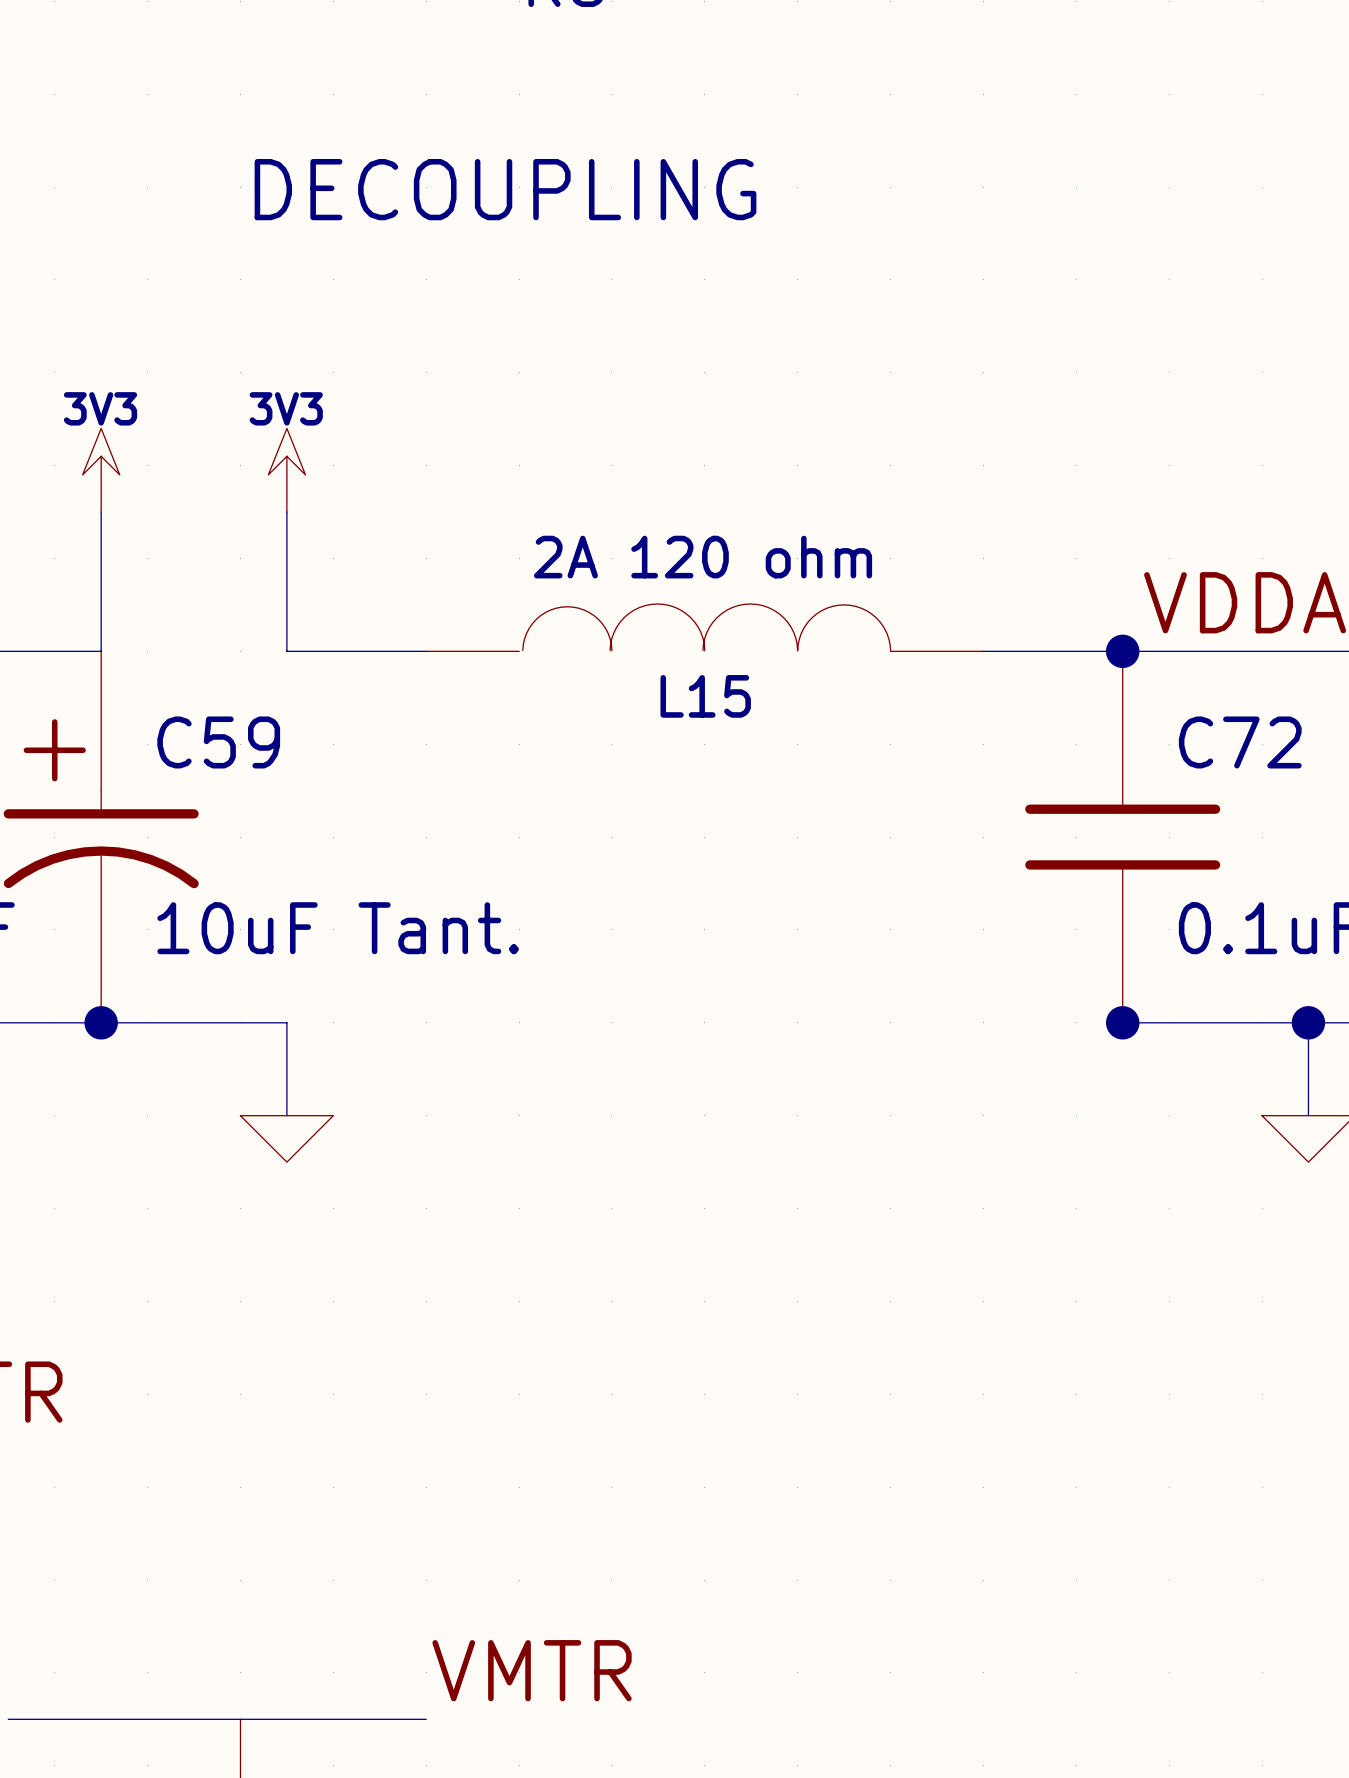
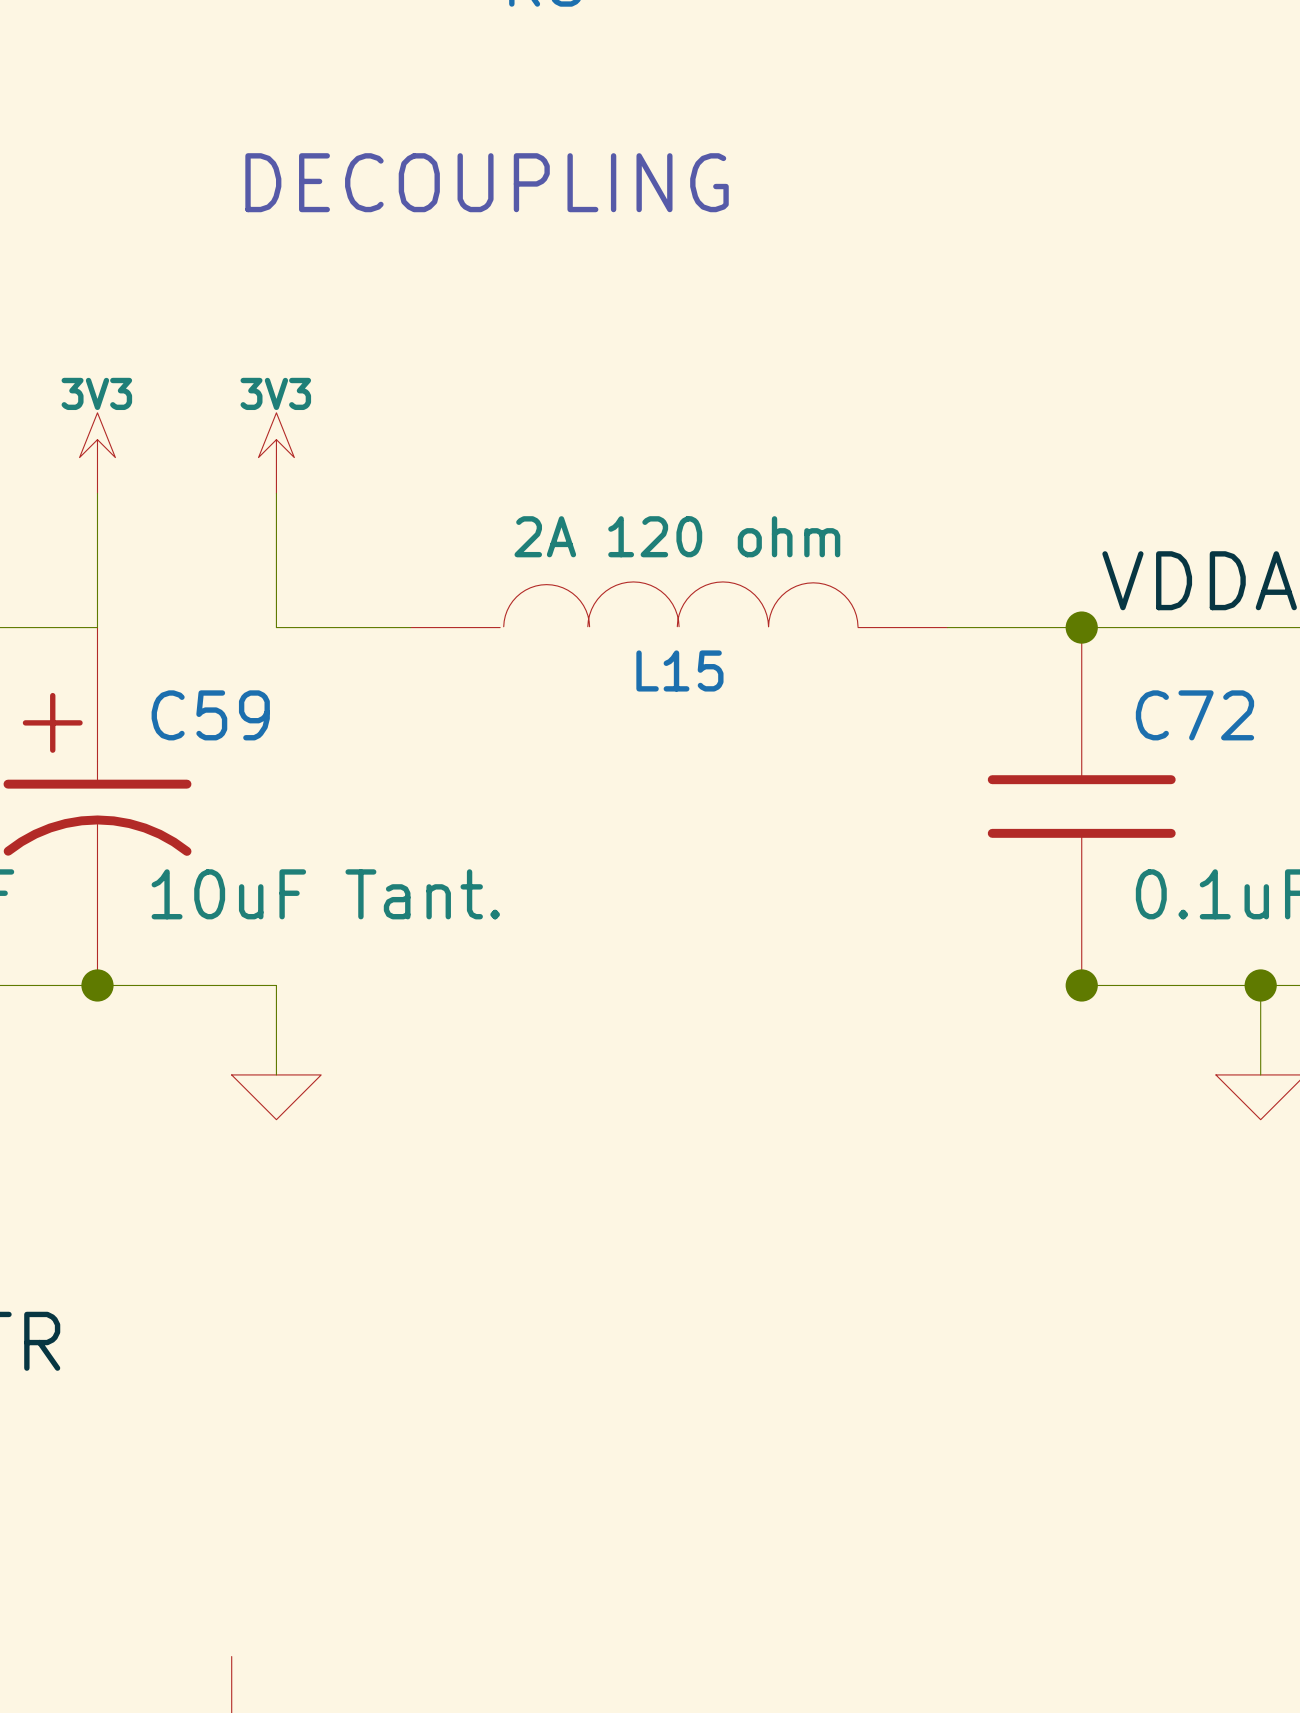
label: VMTR (532, 1670) -> none
wire: (8, 1719) (426, 1719) -> none

